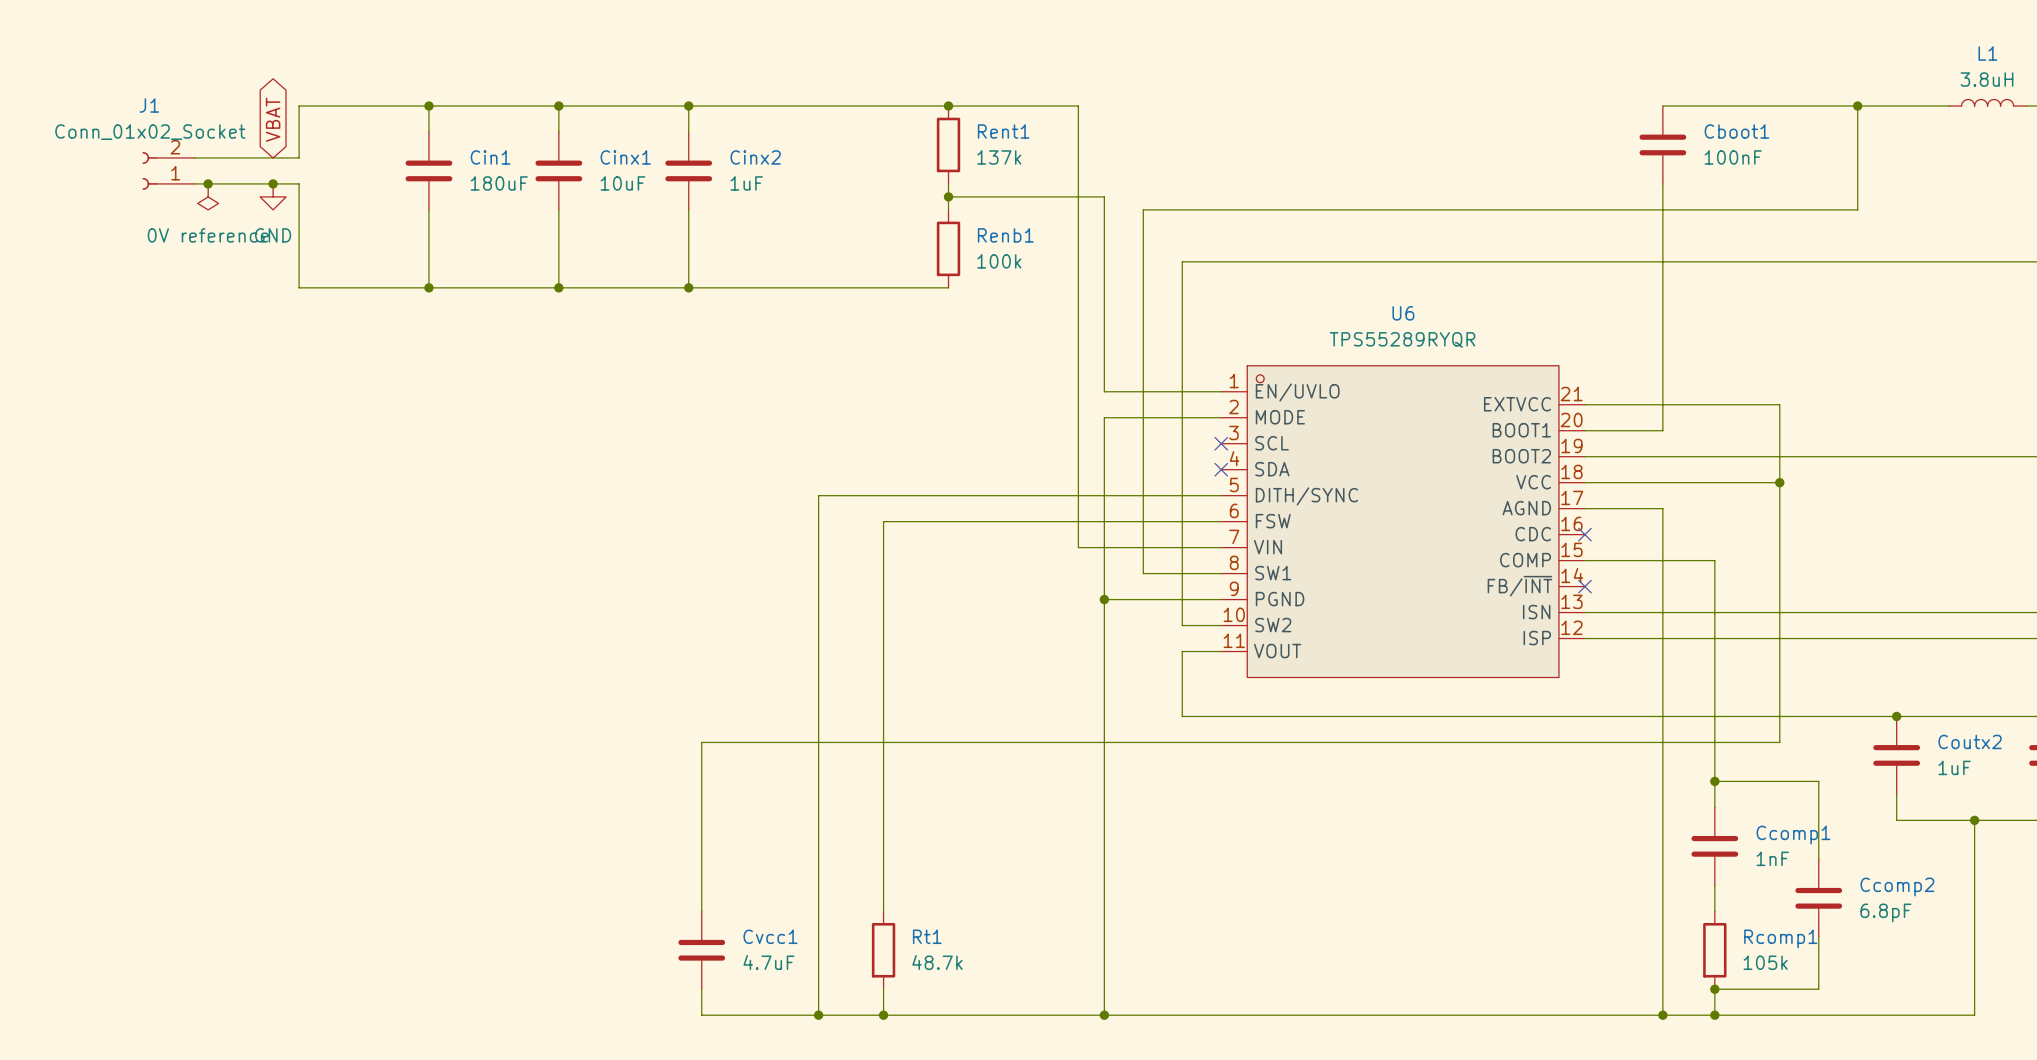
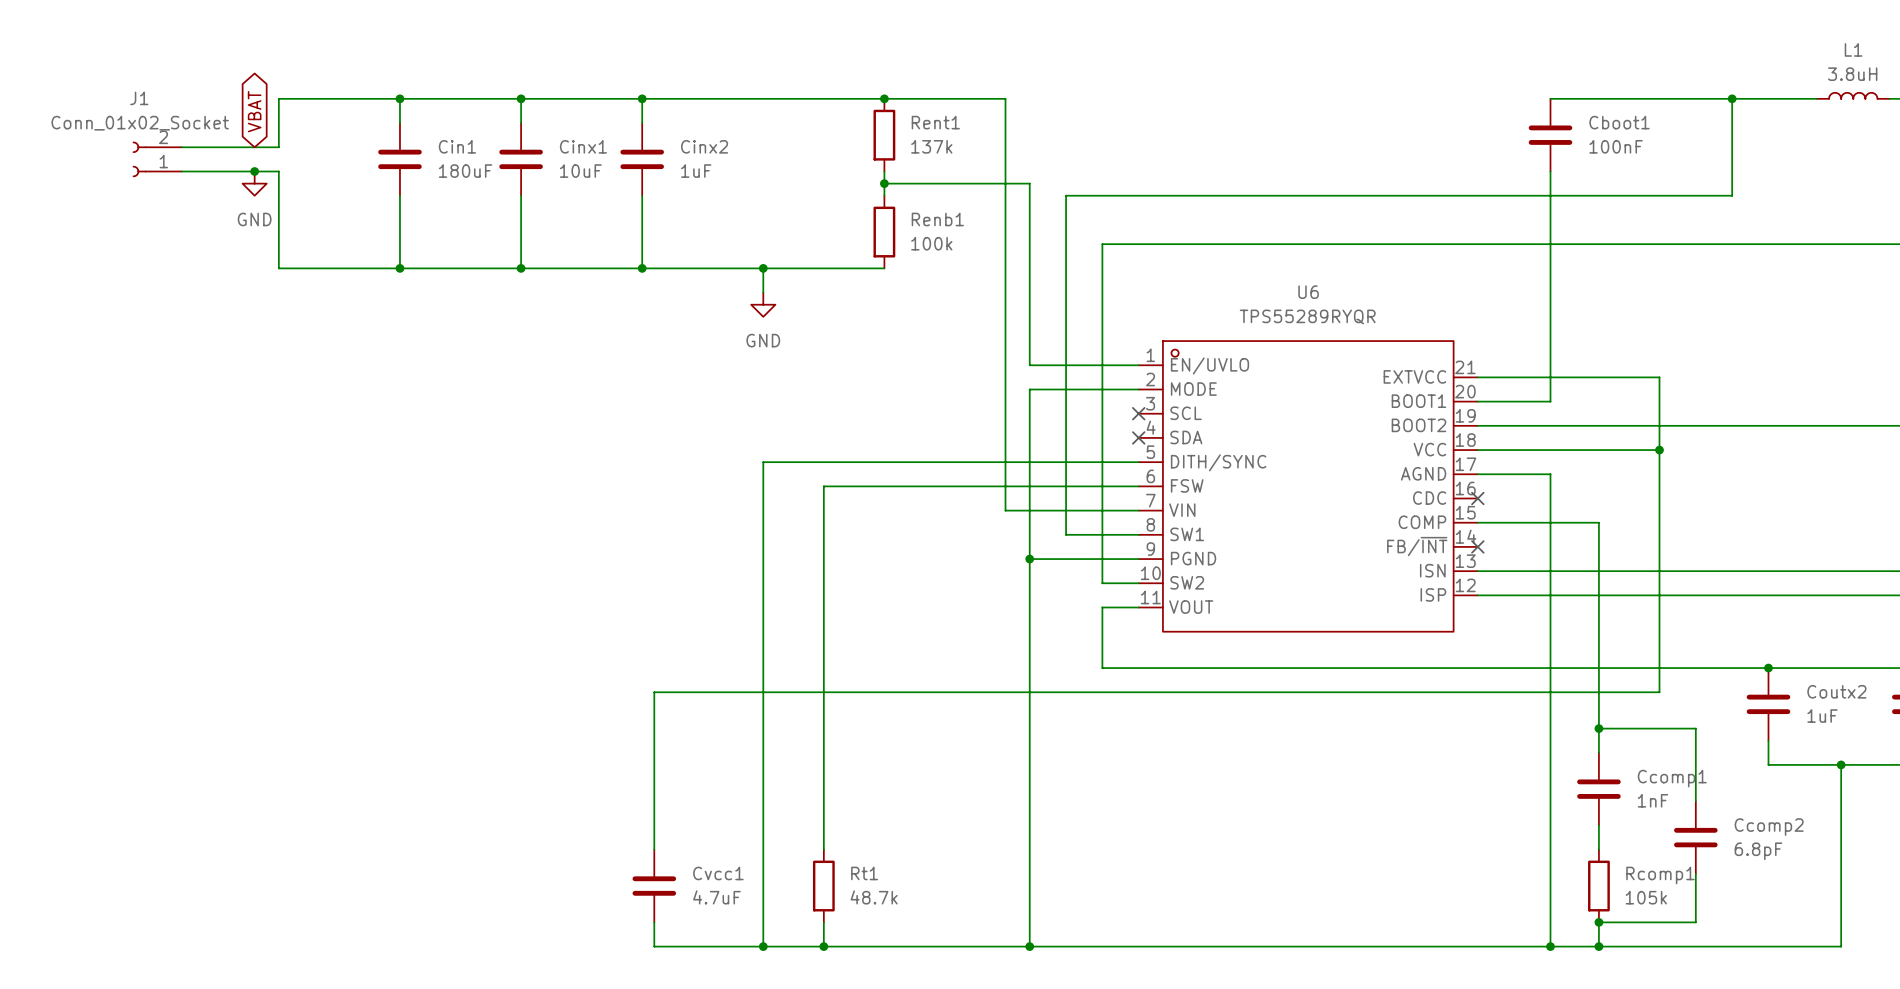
junction: (208, 183) -> none
power symbol: 0V reference (208, 196) -> none
wire: none -> (763, 268) (763, 292)
junction: none -> (763, 268)
power symbol: none -> GND (763, 304)

